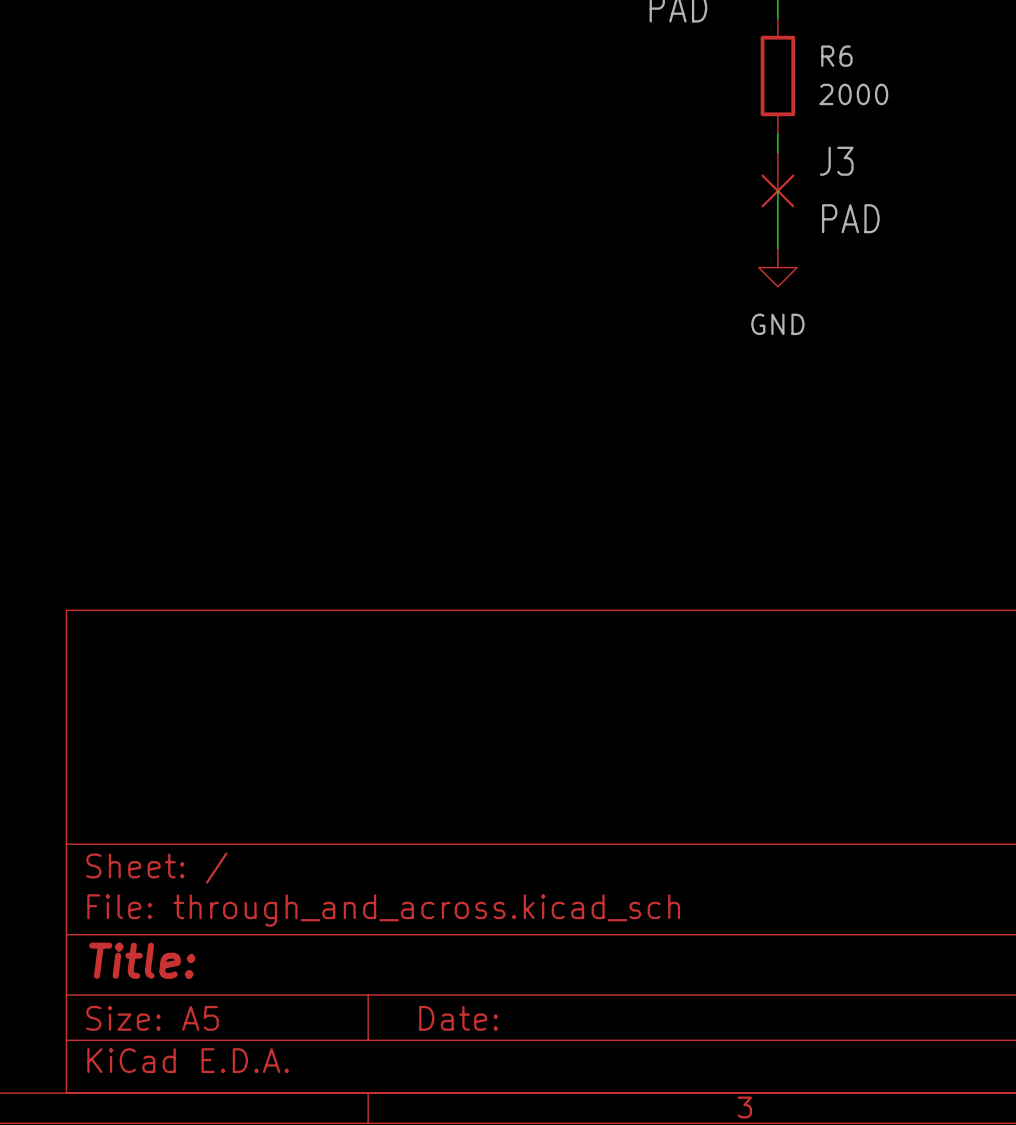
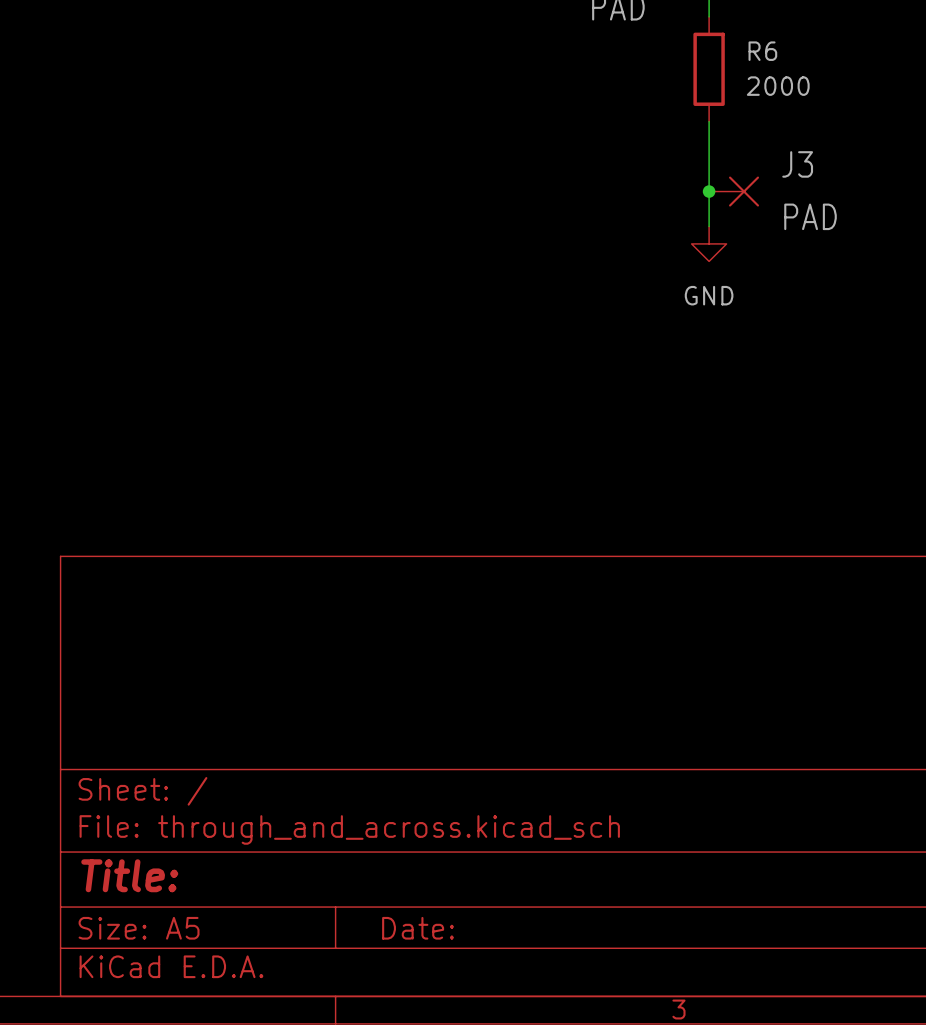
J3 position: (777, 180) -> (734, 191)
J3 rotation: 0° (777, 190) -> 90° counterclockwise (744, 191)
junction: none -> (709, 191)

